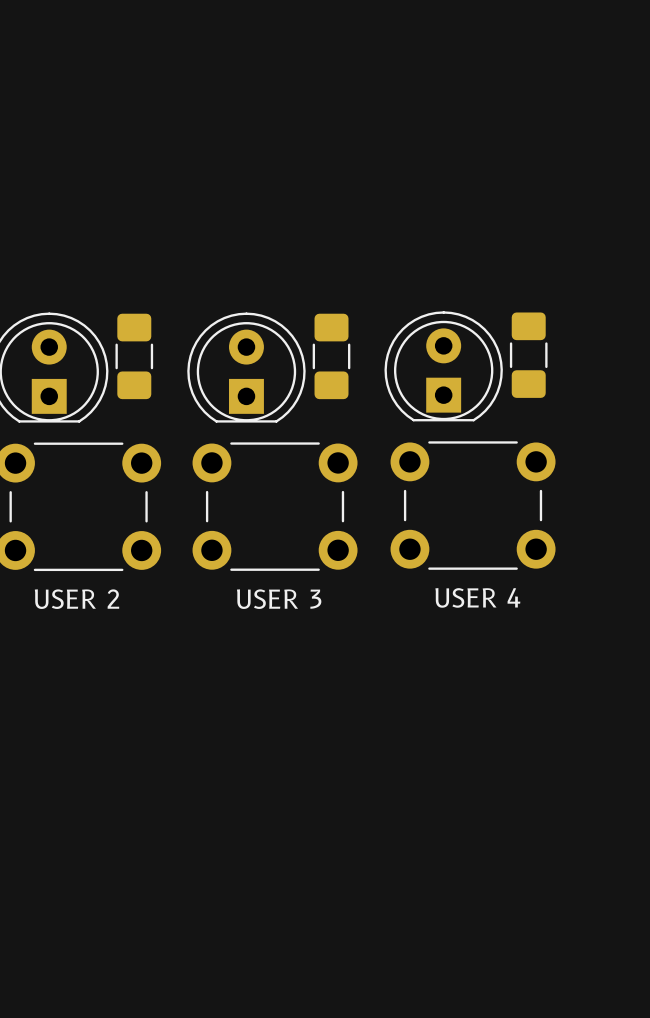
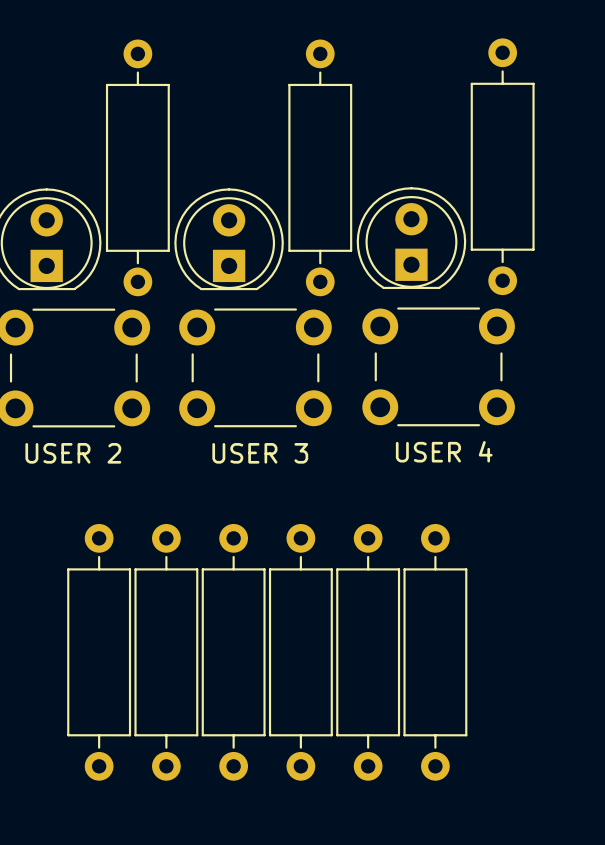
part: none -> (502, 166)
part: none -> (137, 167)
part: none -> (320, 167)
part: (528, 355) -> none
part: (134, 356) -> none
part: (331, 356) -> none
part: none -> (99, 652)
part: none -> (166, 652)
part: none -> (233, 652)
part: none -> (300, 652)
part: none -> (368, 652)
part: none -> (435, 652)

